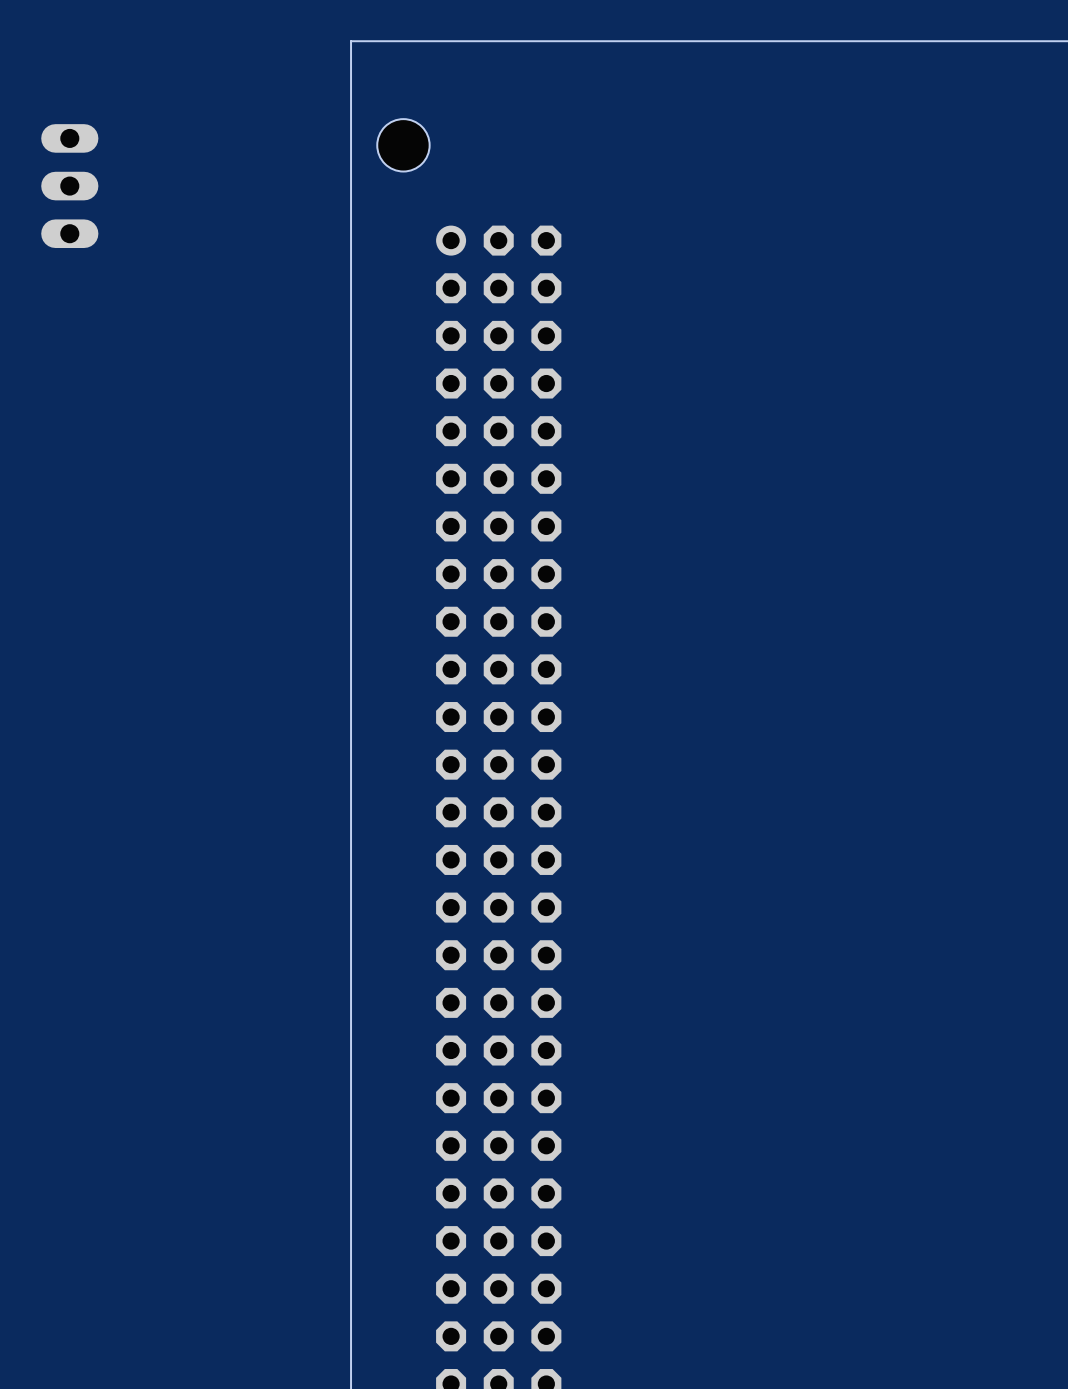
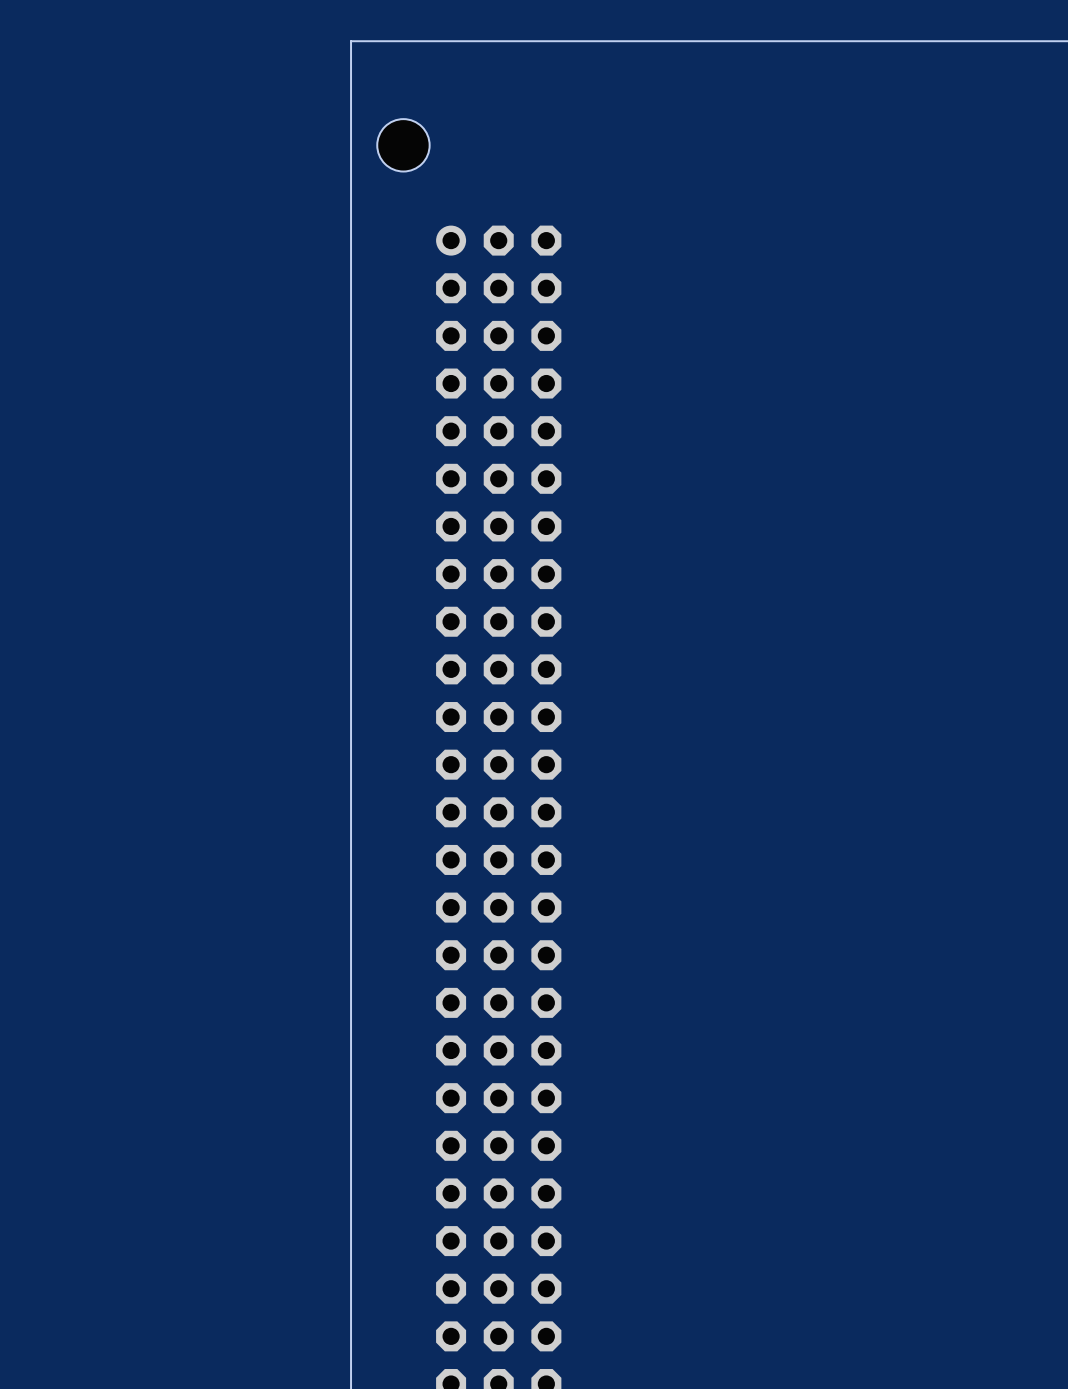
part: (69, 186) -> none

